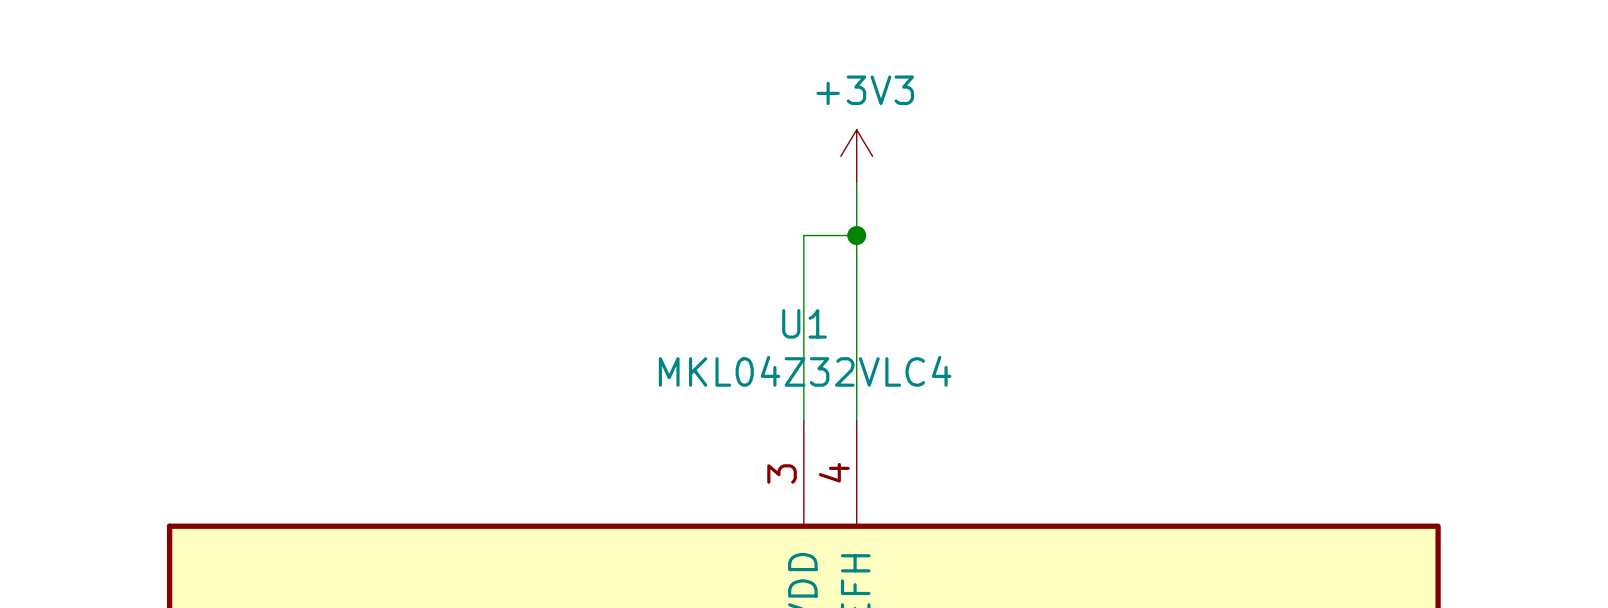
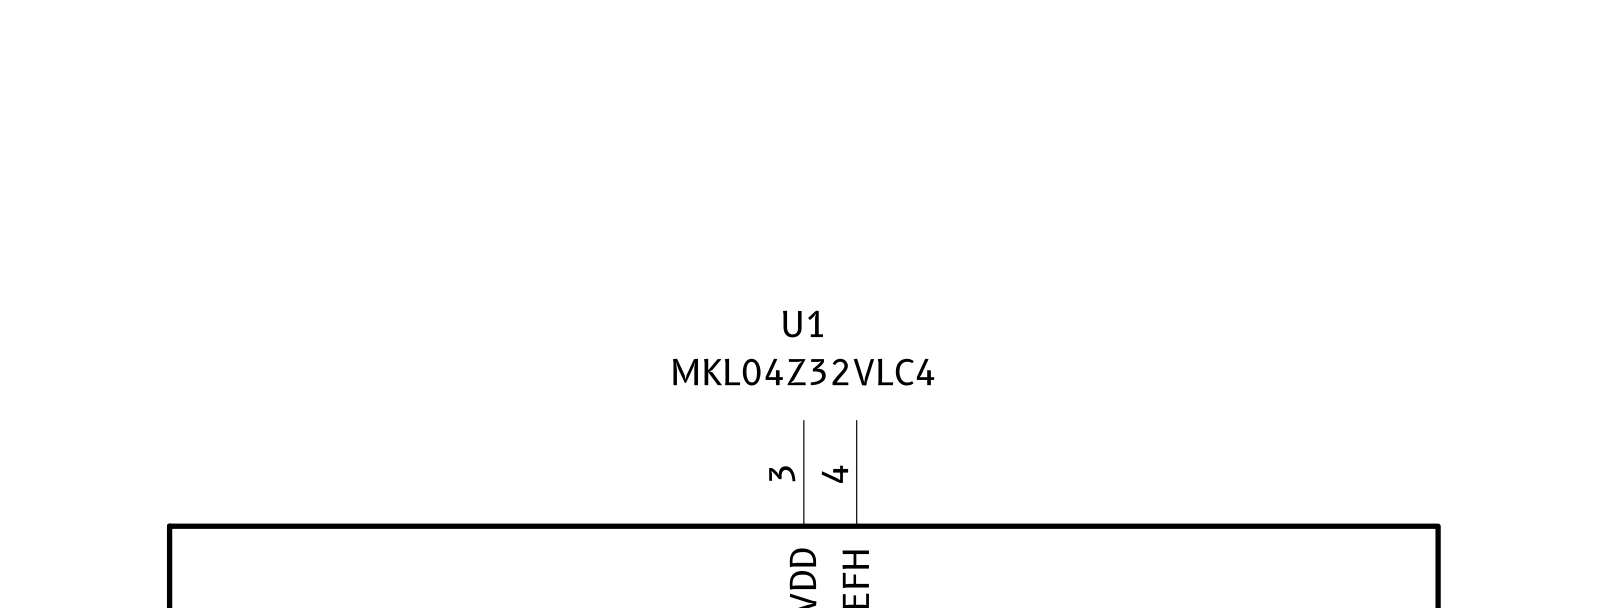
power symbol: +3V3 (856, 156) -> none
wire: (856, 182) (856, 420) -> none
wire: (856, 235) (803, 235) (803, 420) -> none
junction: (856, 235) -> none

